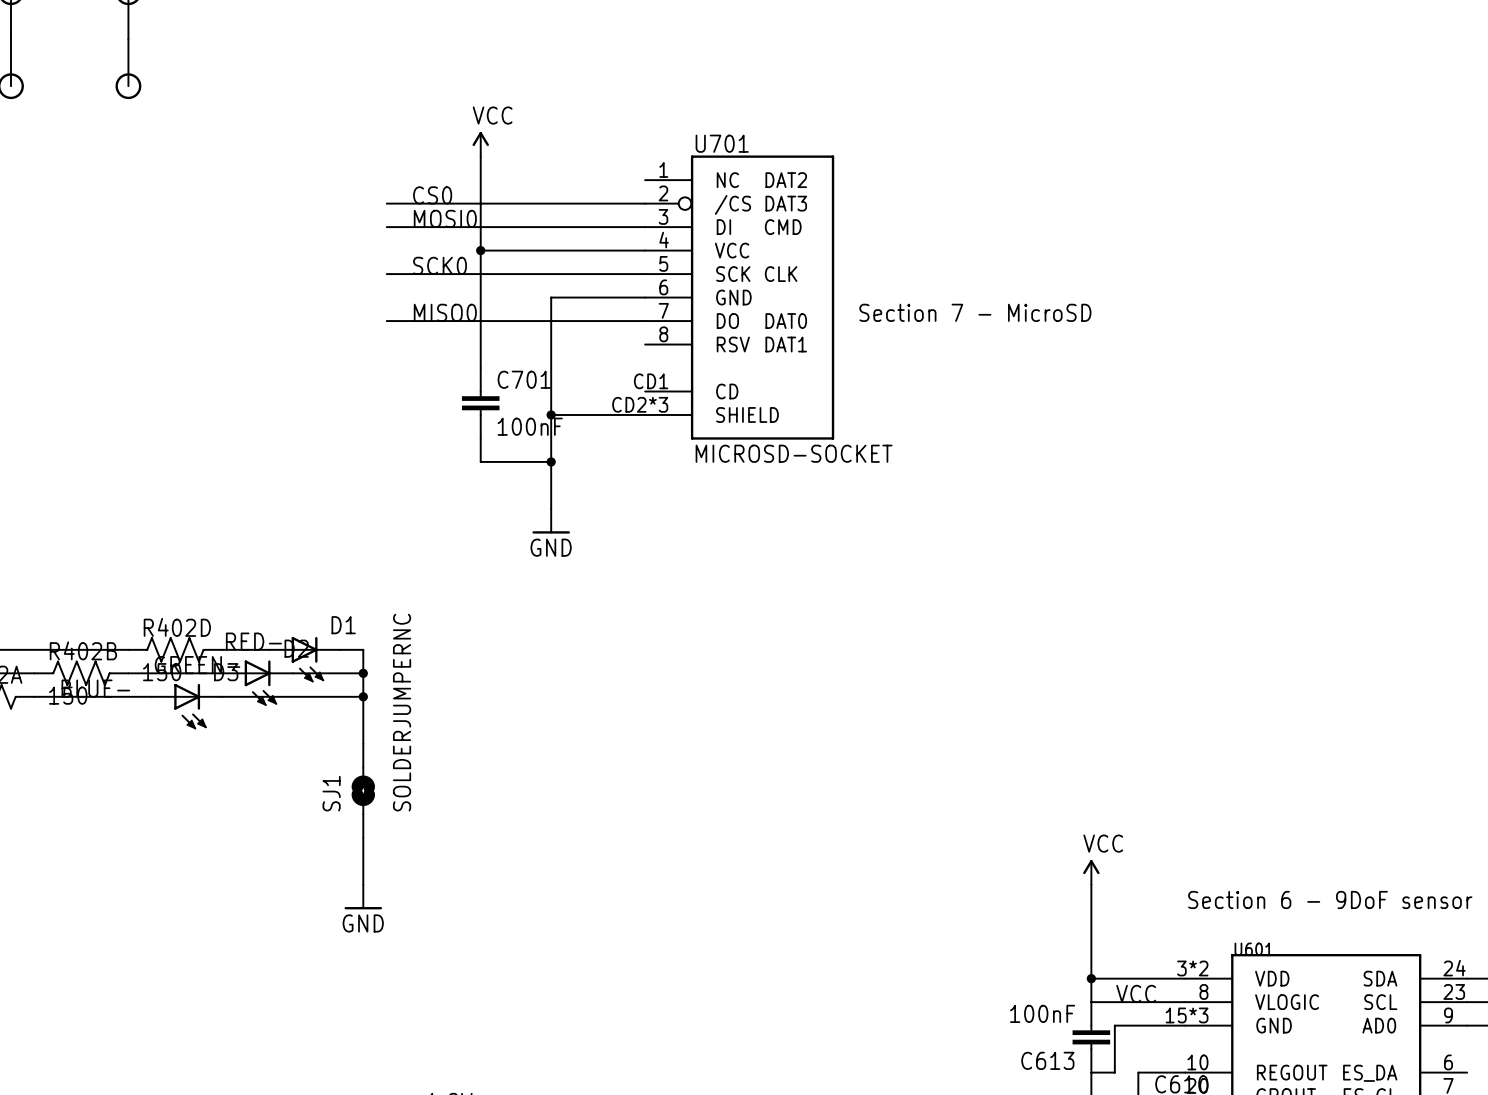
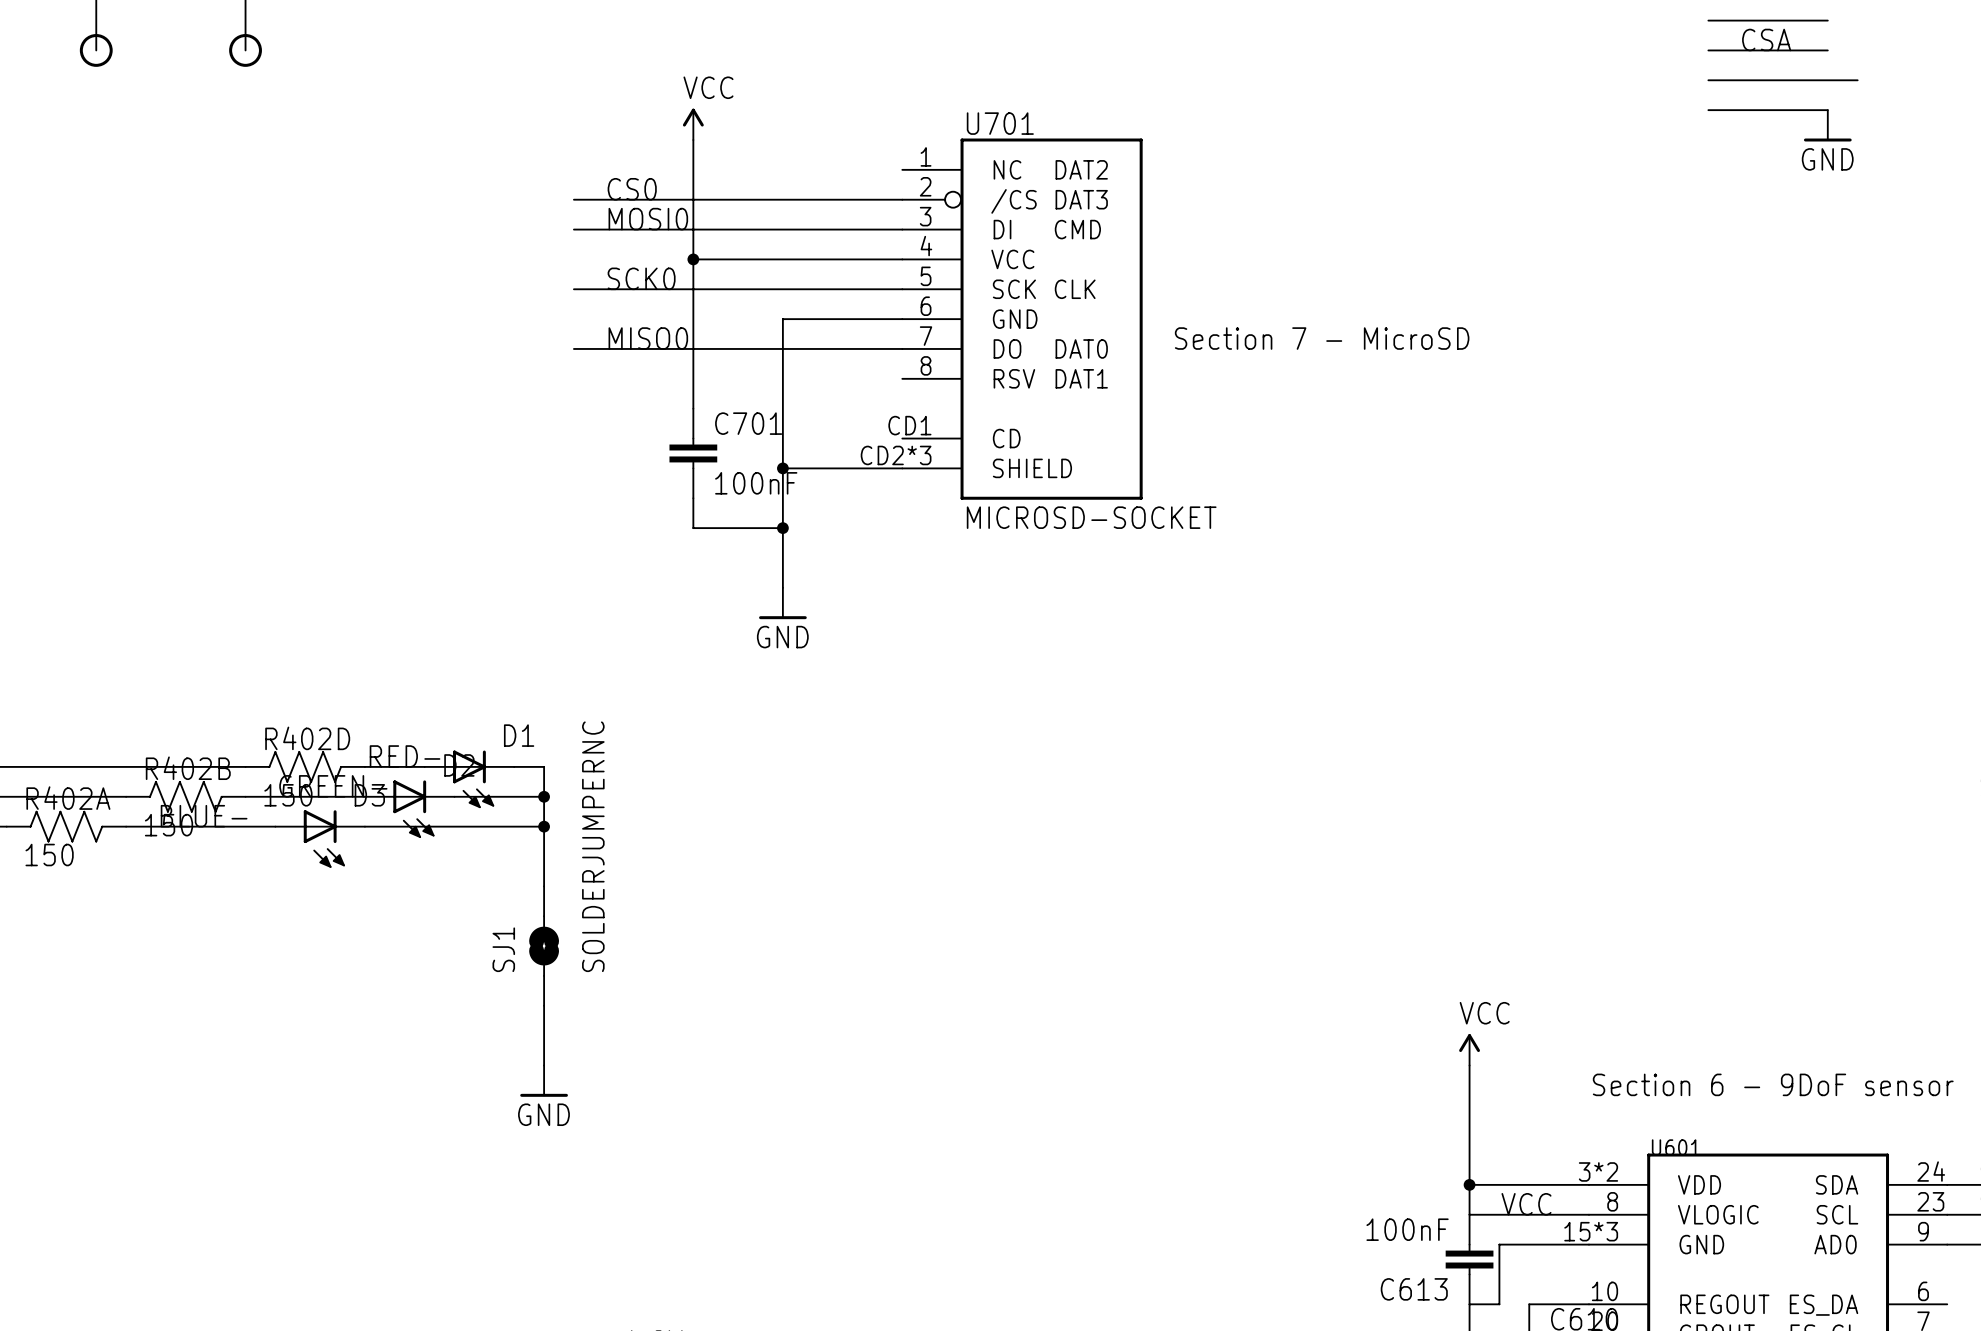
wire: none -> (1708, 20) (1827, 20)
label: none -> CSA (1766, 39)
wire: none -> (1708, 50) (1827, 50)
wire: none -> (1708, 80) (1857, 80)
wire: none -> (1708, 110) (1827, 110)
power symbol: none -> GND (1827, 125)

